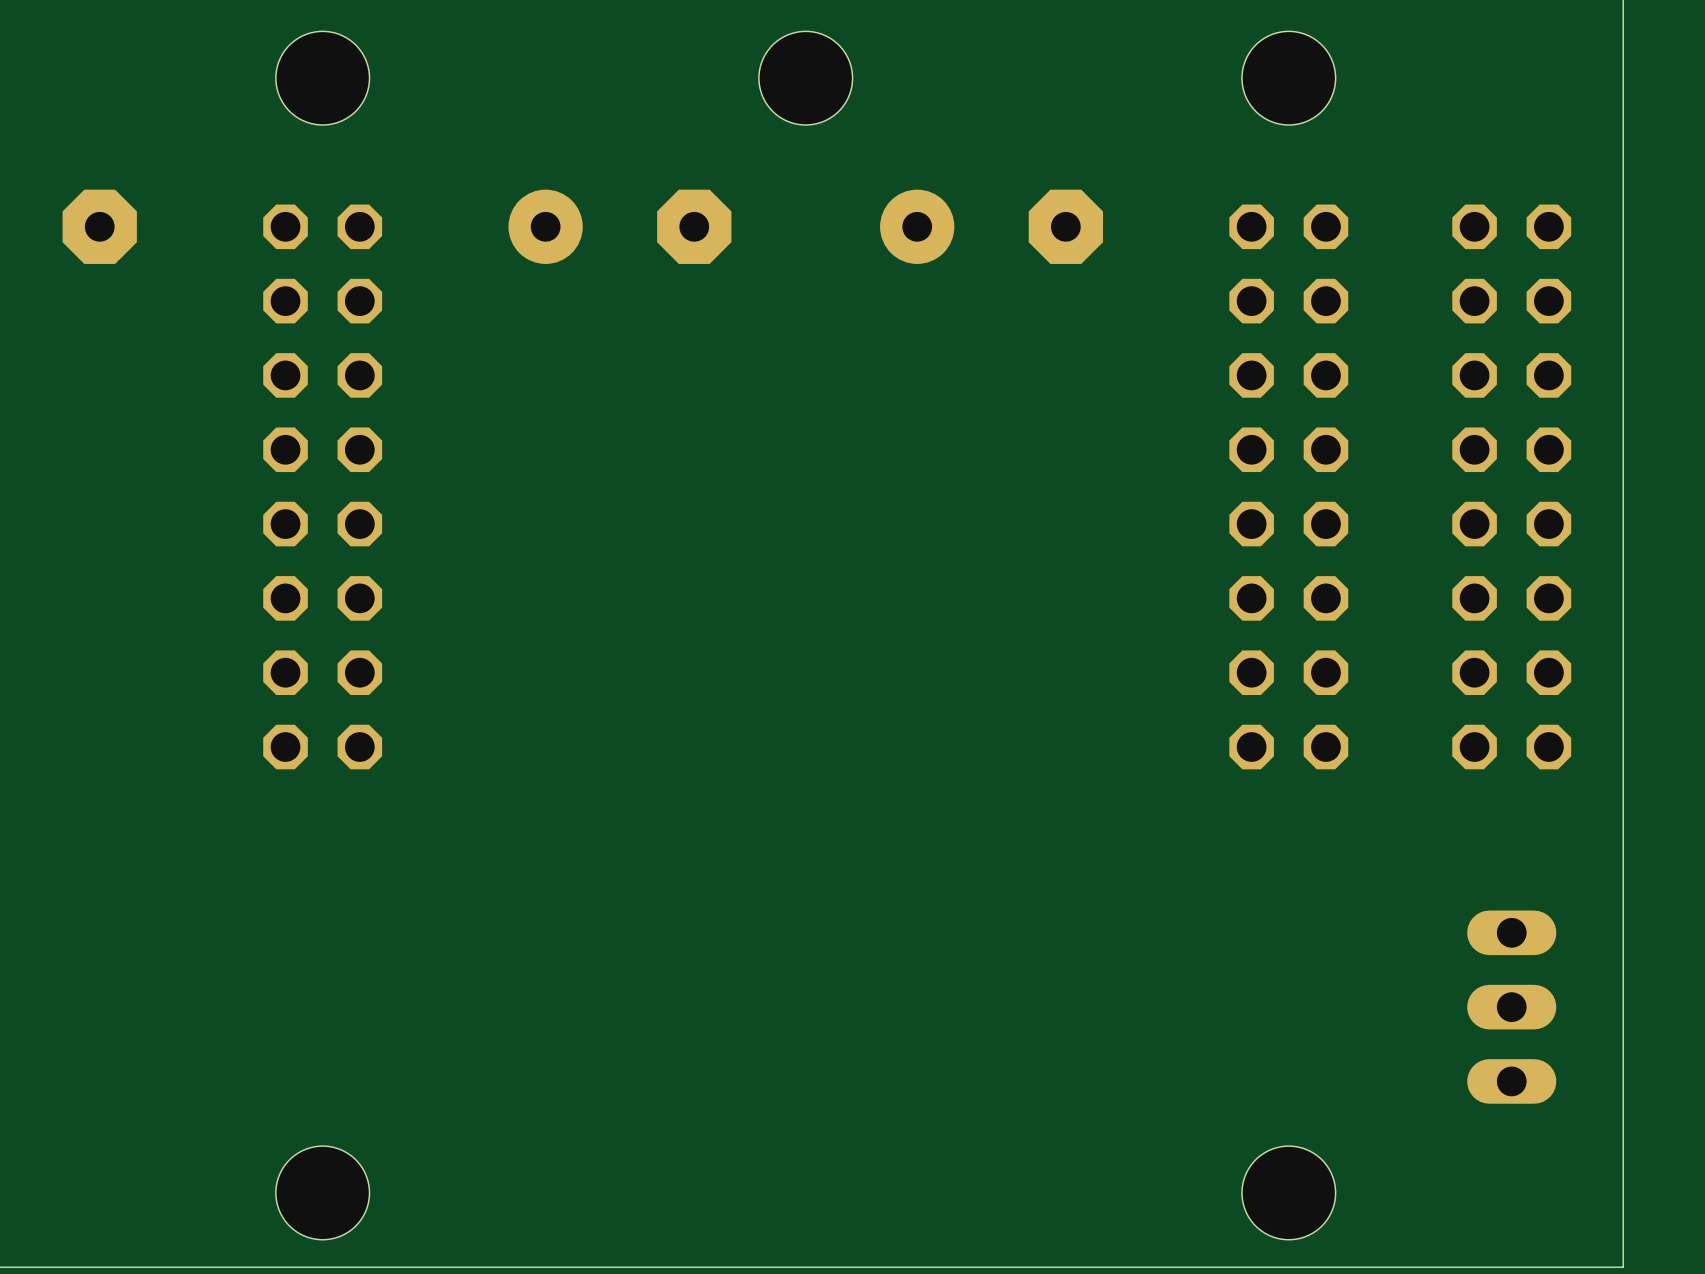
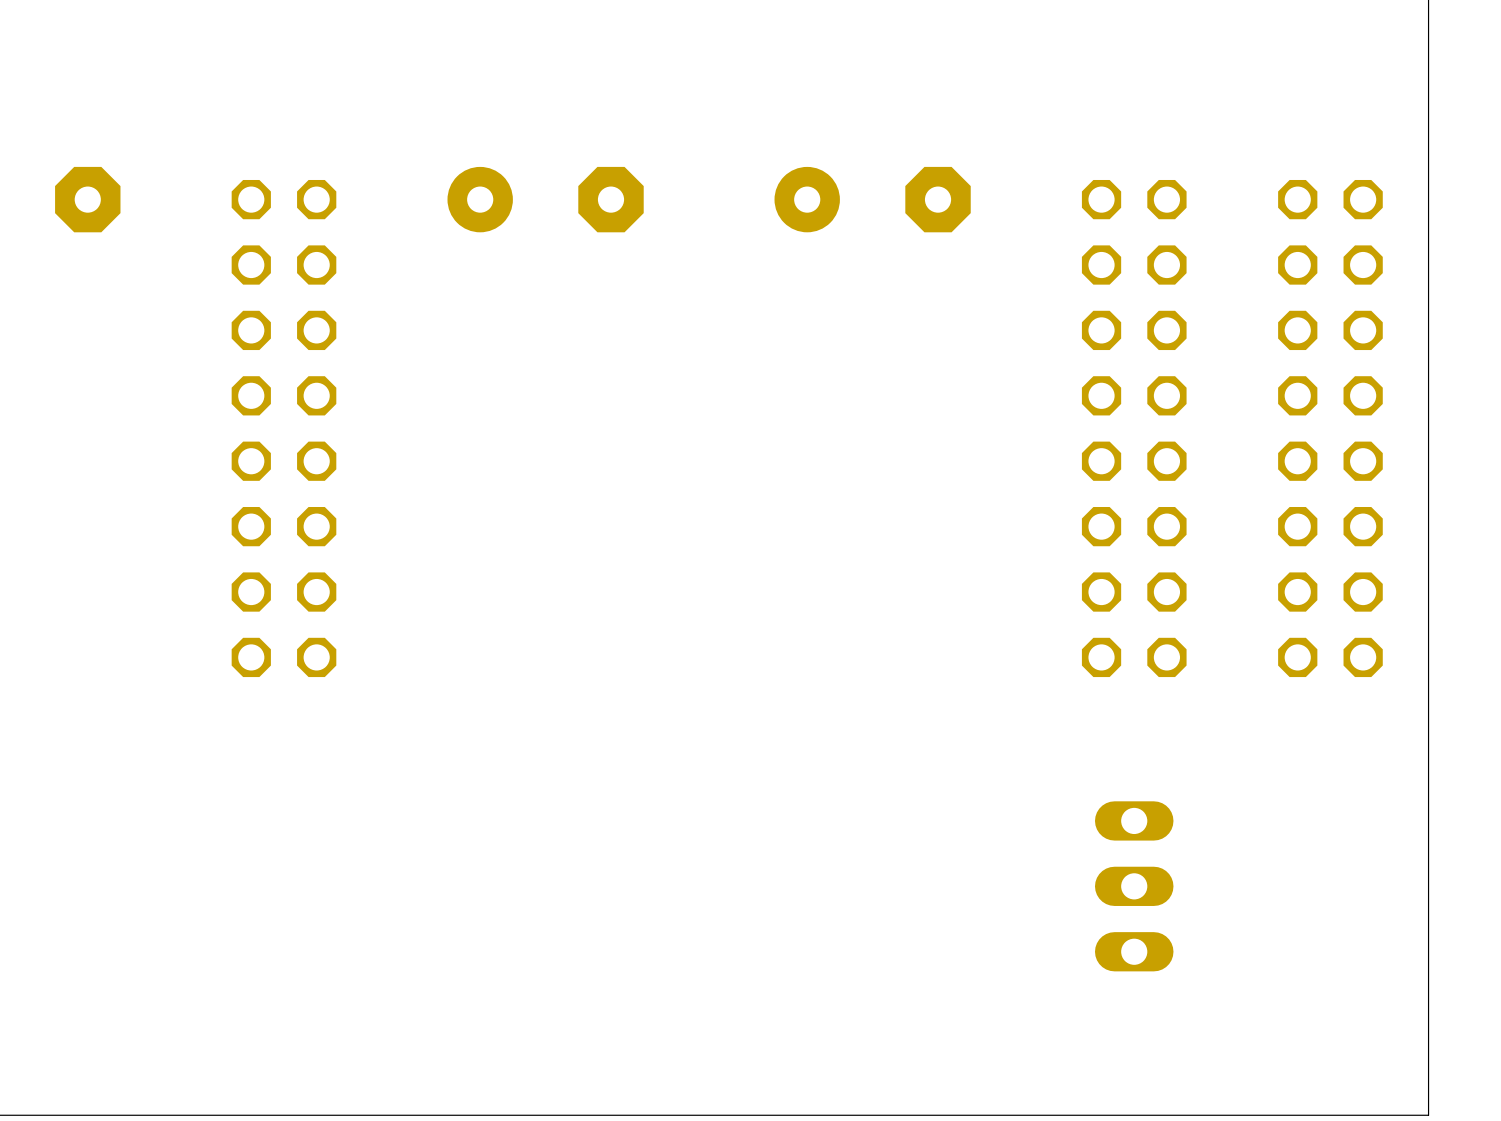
part: (322, 78) -> none
part: (805, 78) -> none
part: (1288, 78) -> none
part position: (1511, 1007) -> (1134, 886)
part: (322, 1192) -> none
part: (1288, 1192) -> none

